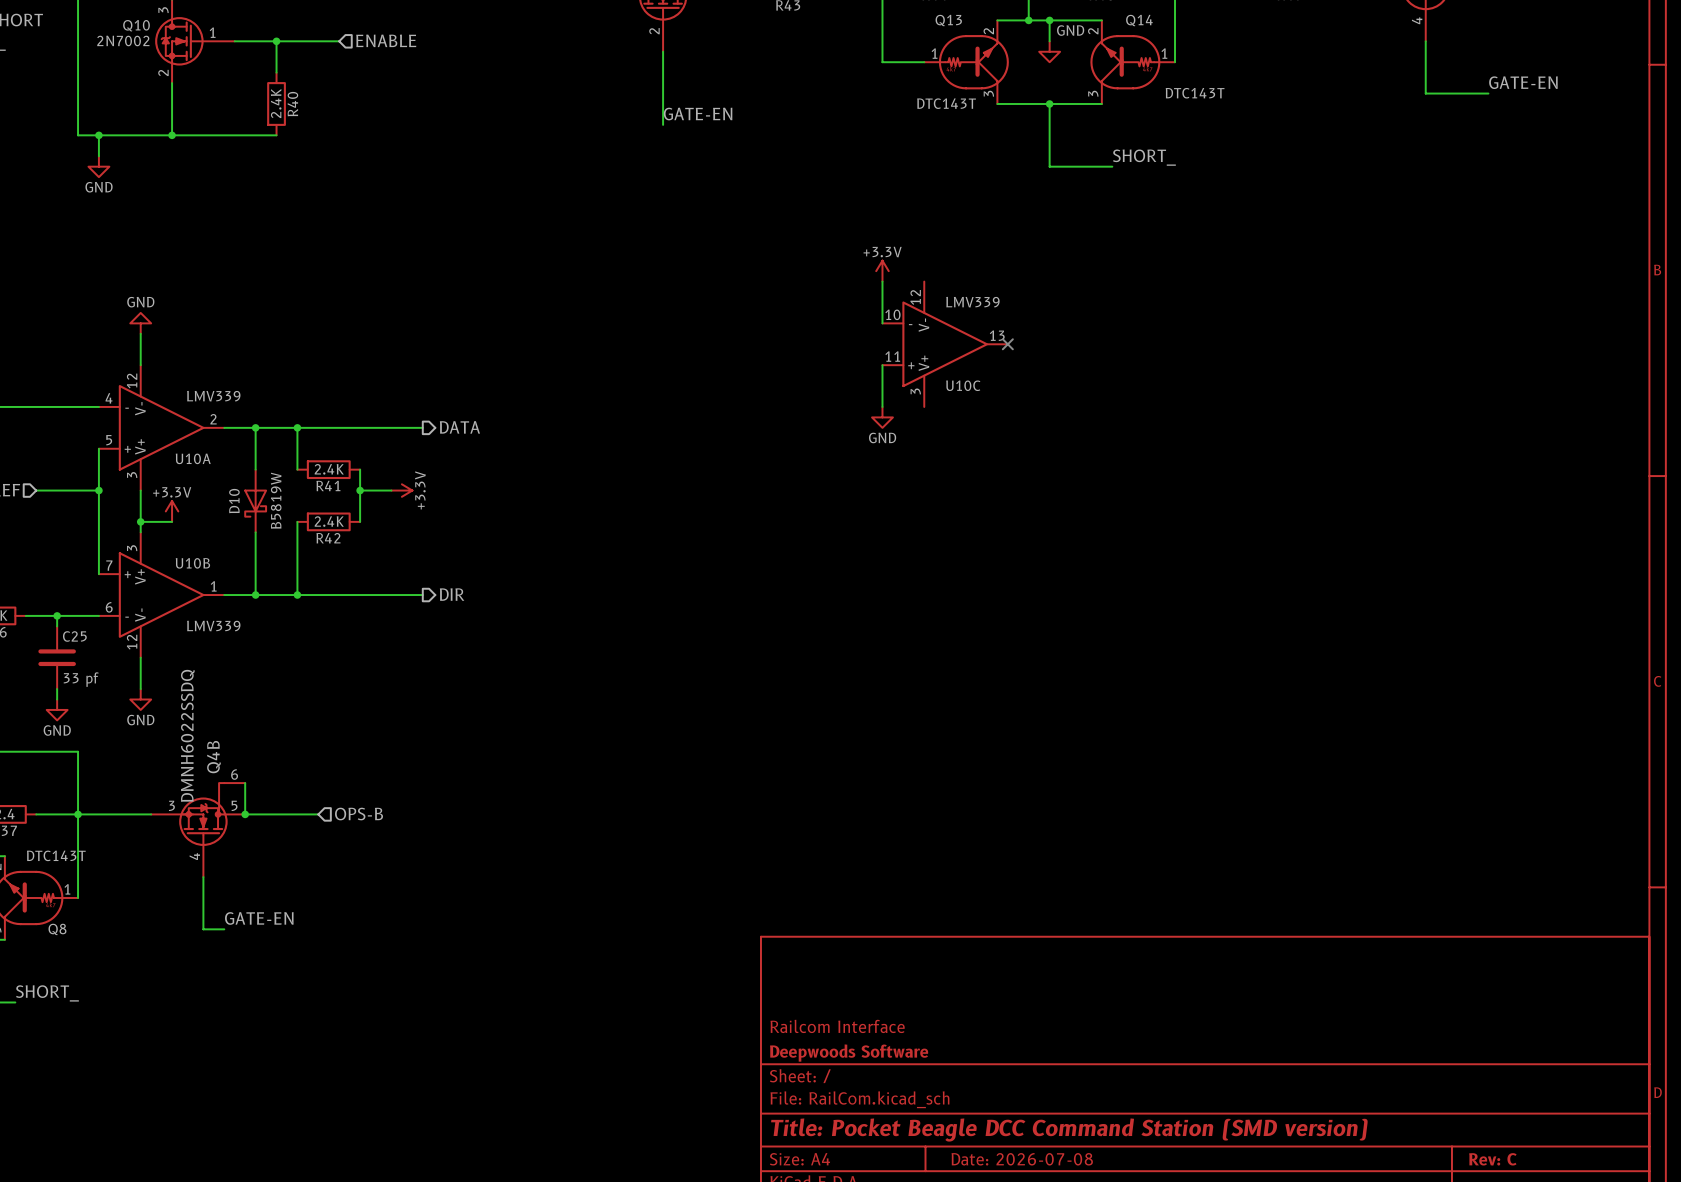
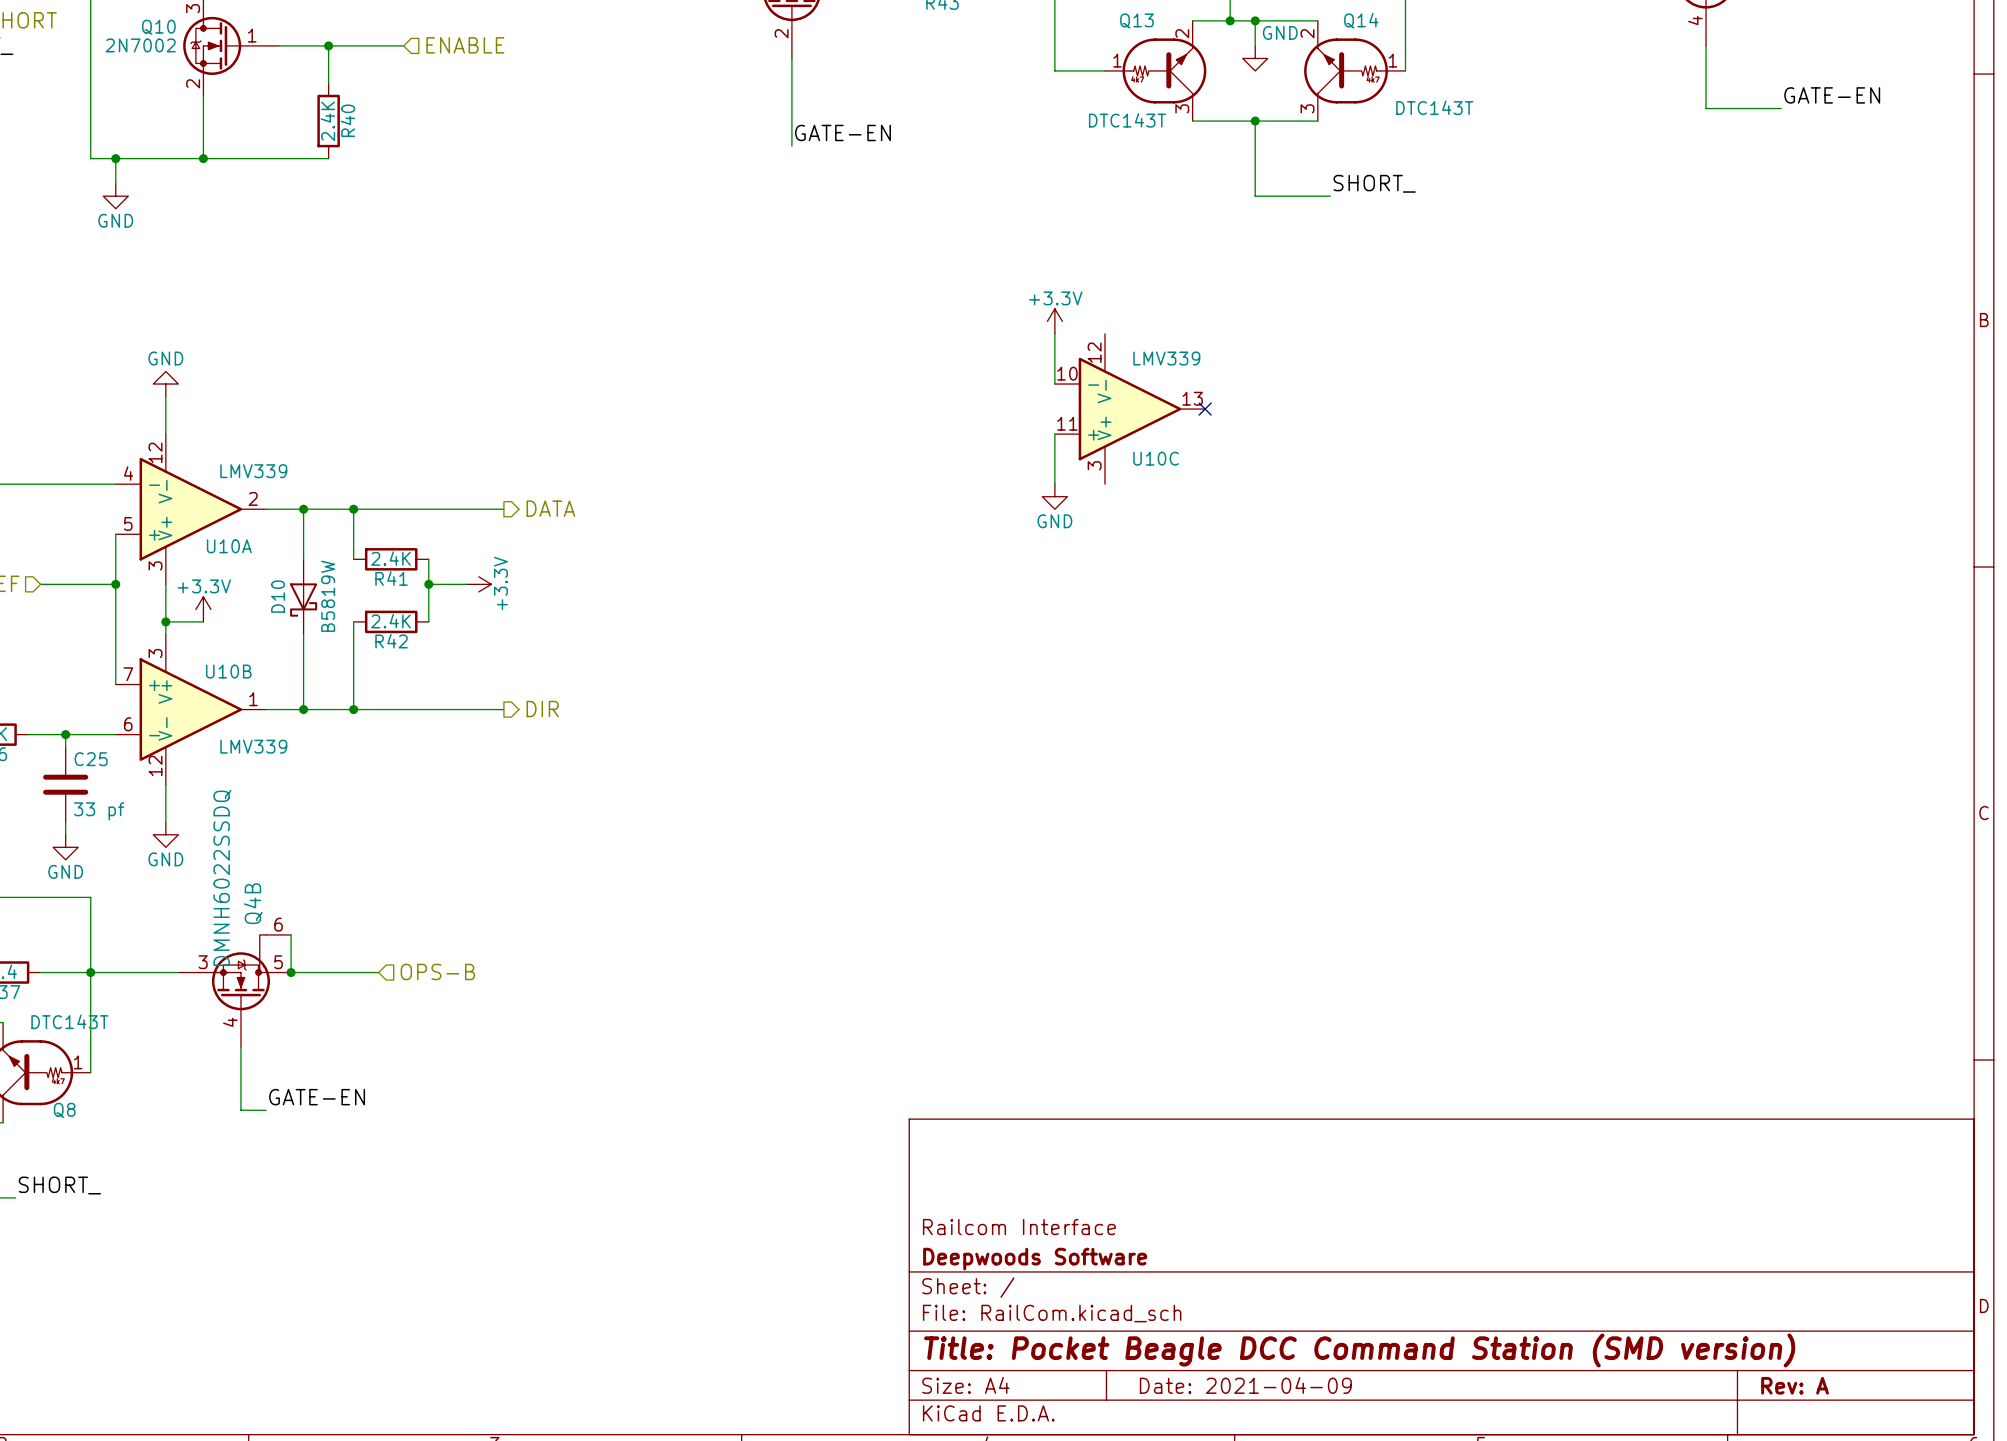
title block: Date: 2026-07-08 (1022, 1159) -> Date: 2021-04-09 (1245, 1385)
title block: Rev: C (1492, 1159) -> Rev: A (1795, 1385)

